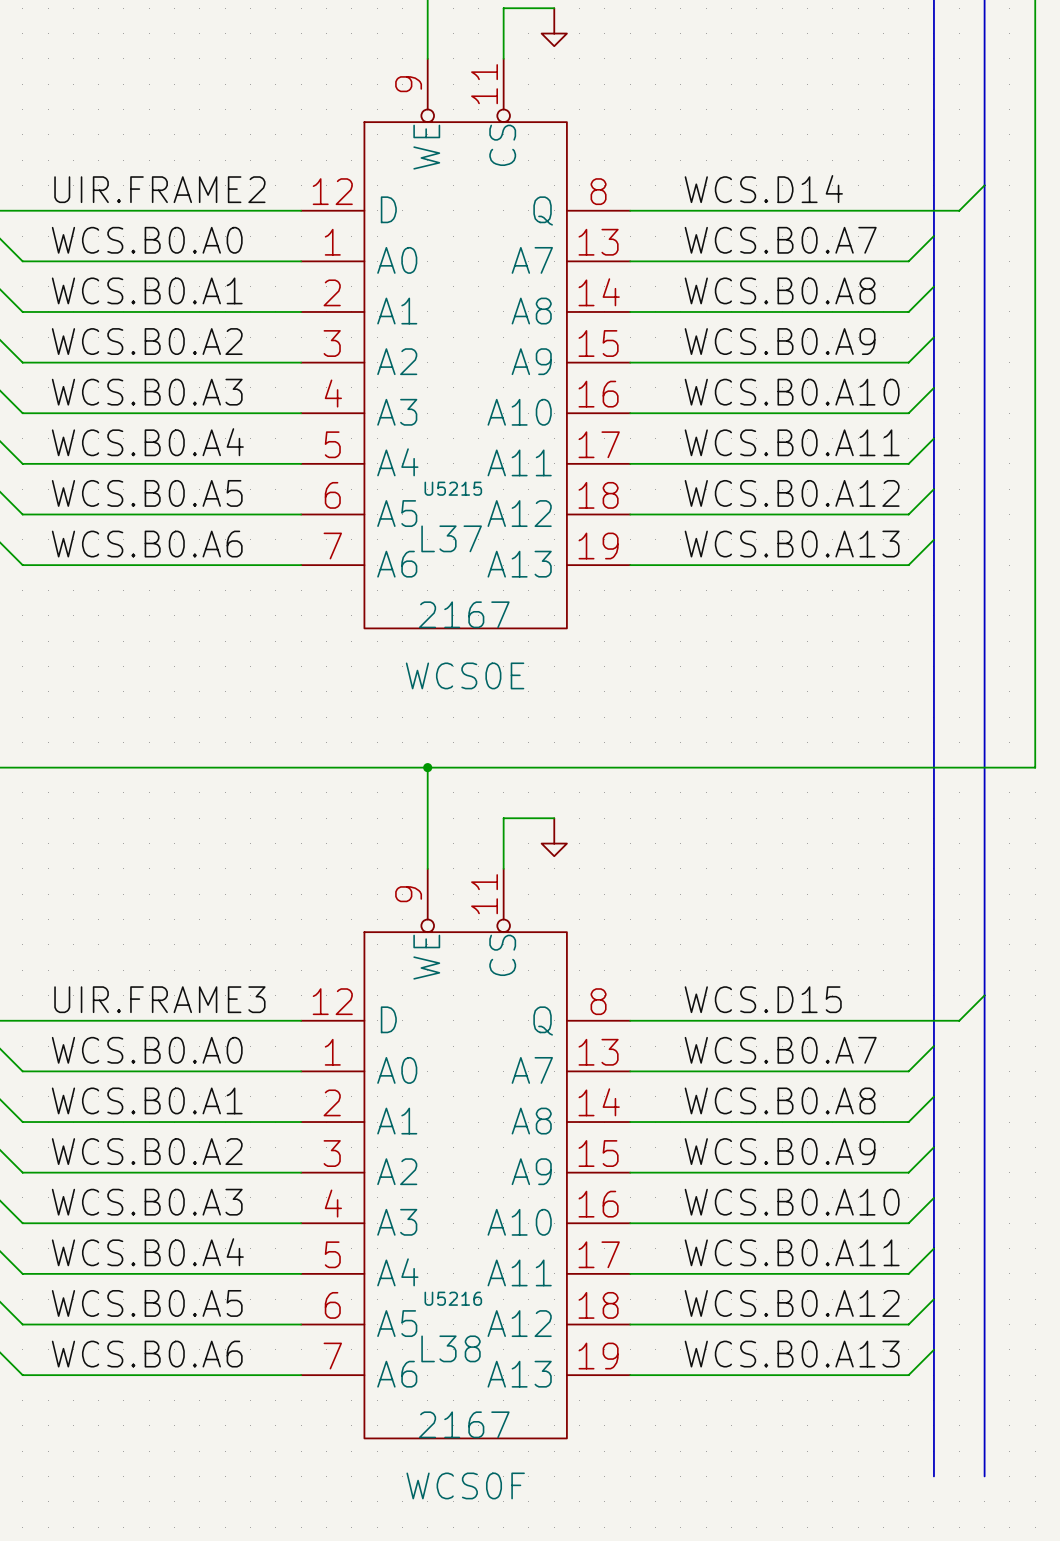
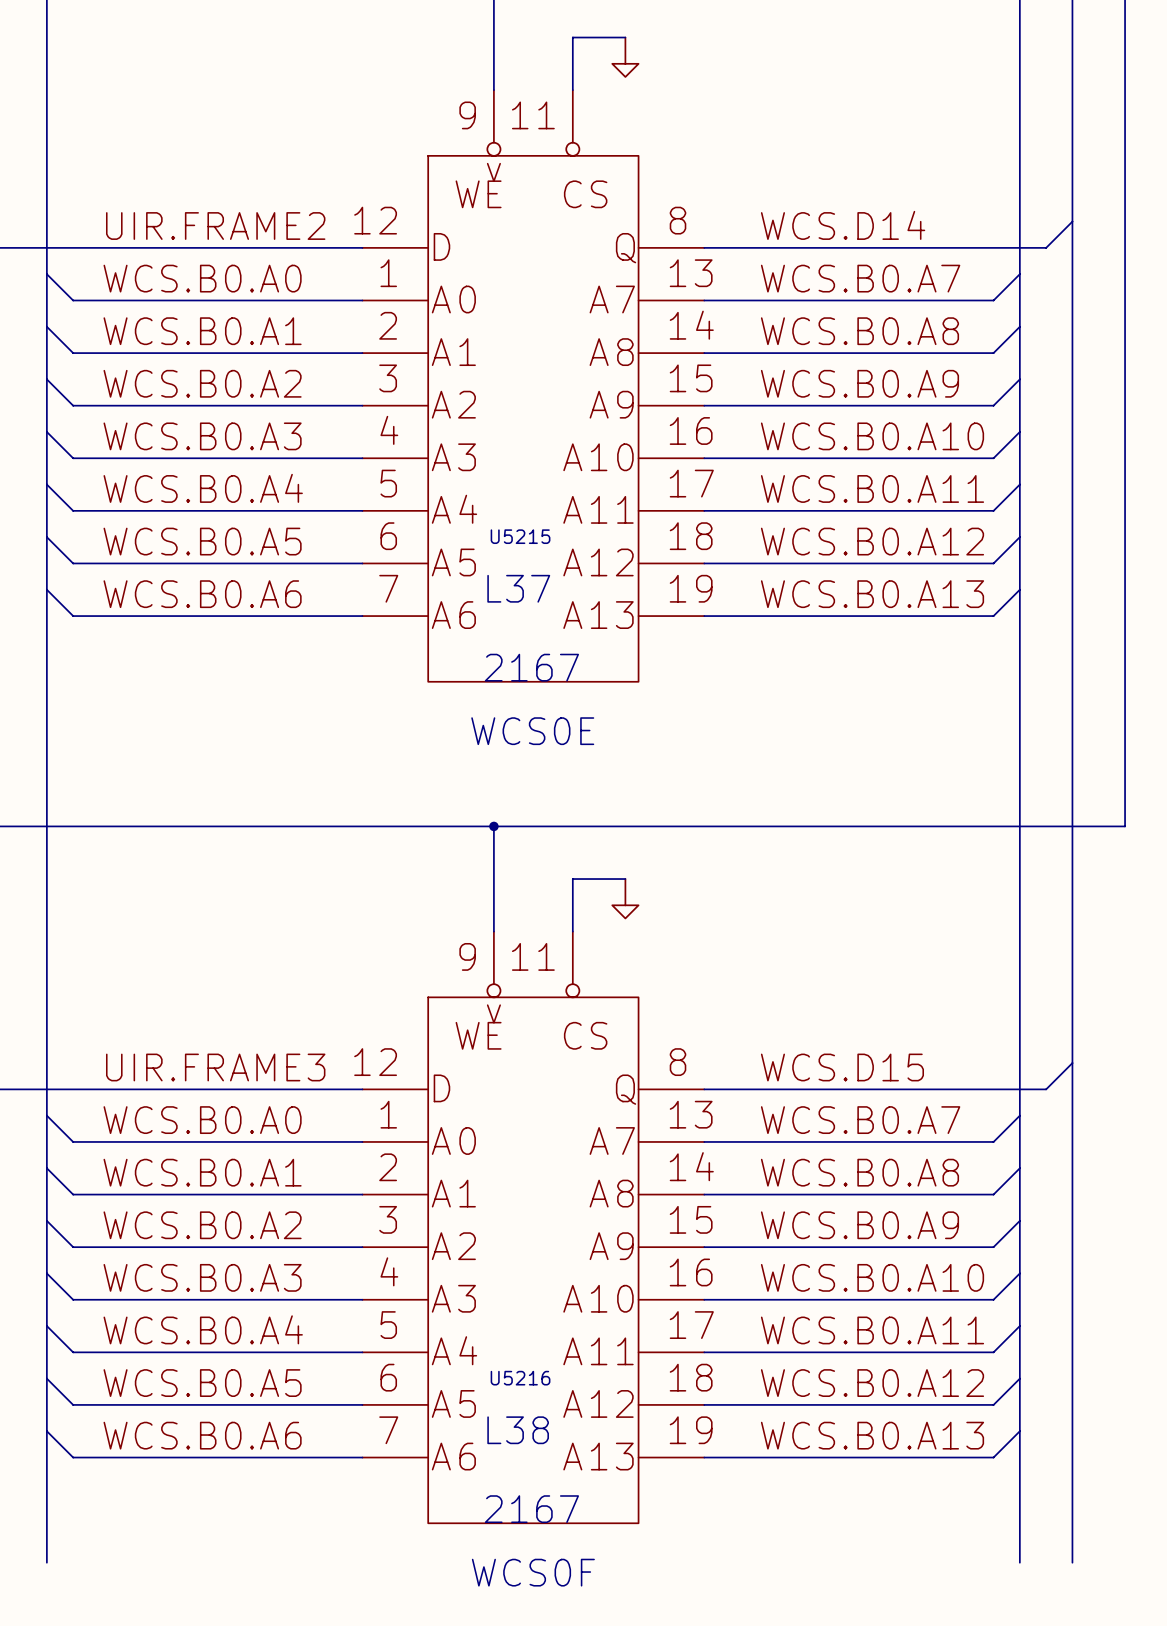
U5215 symbol: [301, 58, 631, 629] -> [362, 90, 705, 682]
U5216 symbol: [301, 868, 631, 1439] -> [362, 931, 705, 1524]

